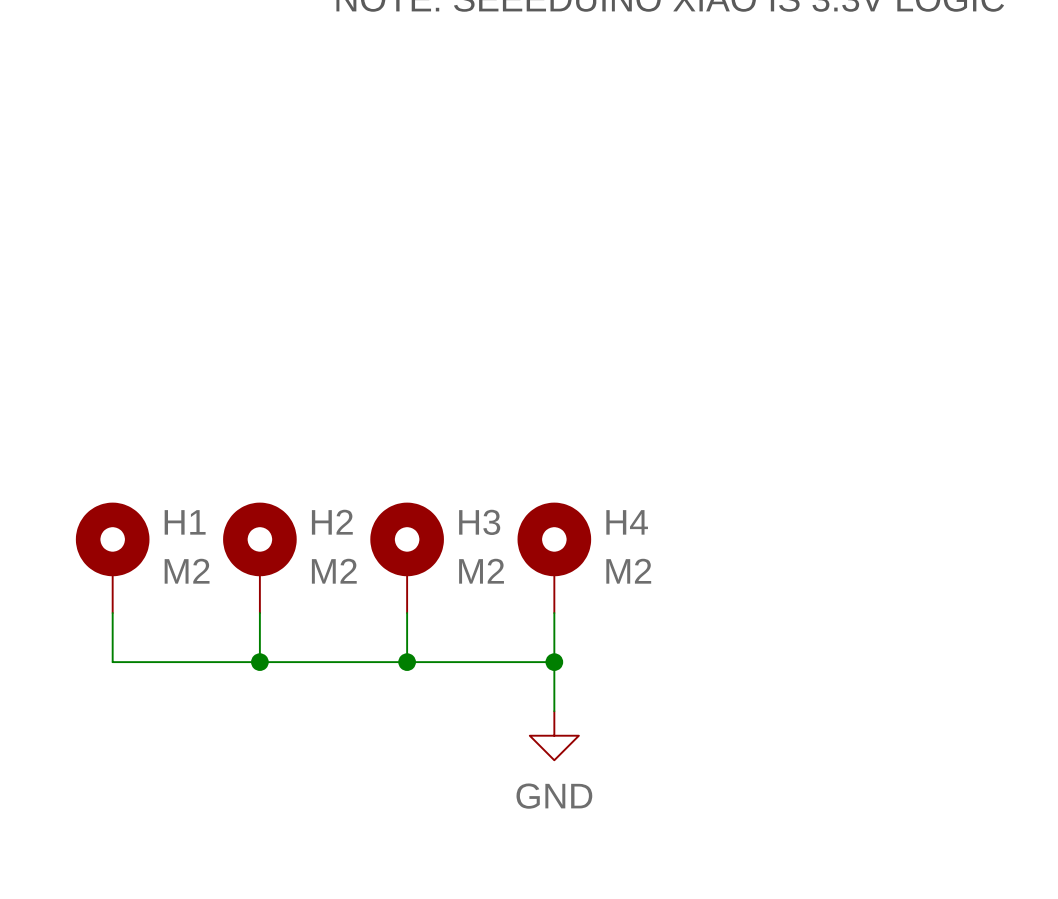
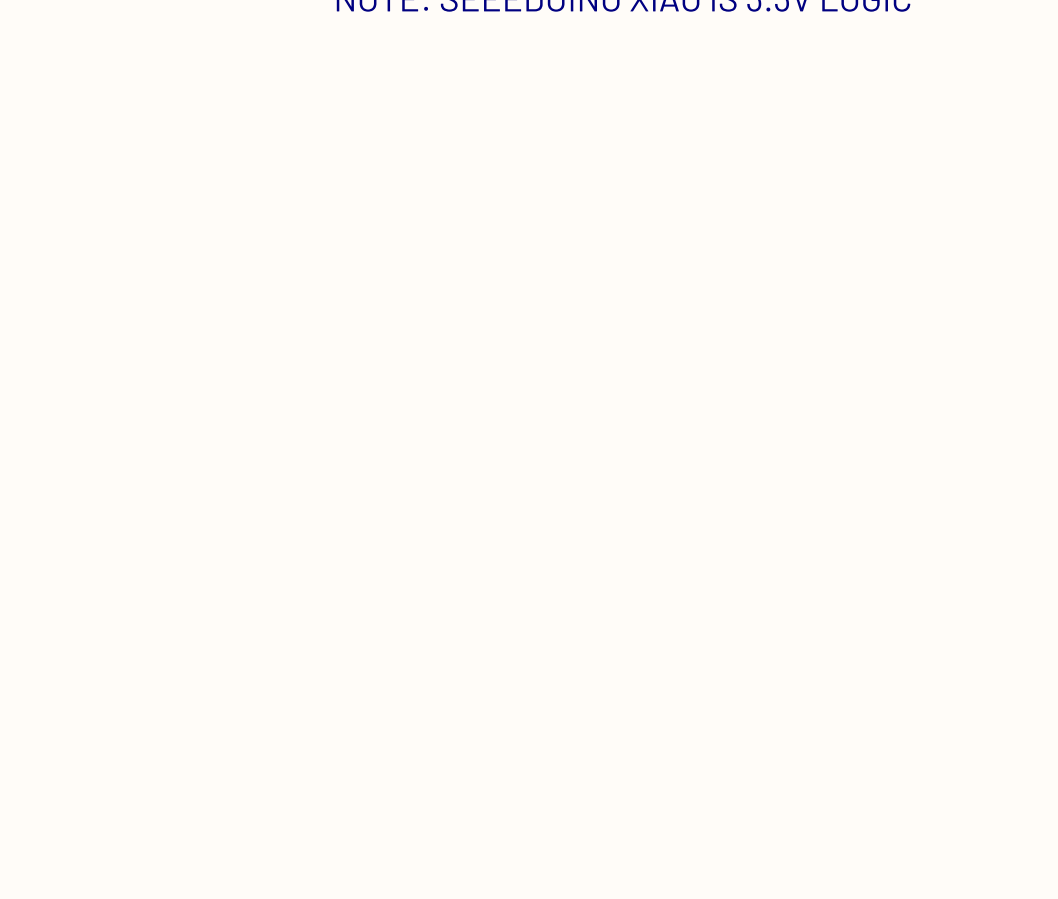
H1: M2 (112, 557) -> none
H2: M2 (259, 557) -> none
H3: M2 (407, 557) -> none
H4: M2 (554, 557) -> none
wire: (112, 613) (112, 662) (554, 662) -> none
wire: (259, 613) (259, 662) -> none
wire: (407, 613) (407, 662) -> none
wire: (554, 613) (554, 711) -> none
junction: (259, 662) -> none
junction: (407, 662) -> none
junction: (554, 662) -> none
power symbol: GND (554, 735) -> none

